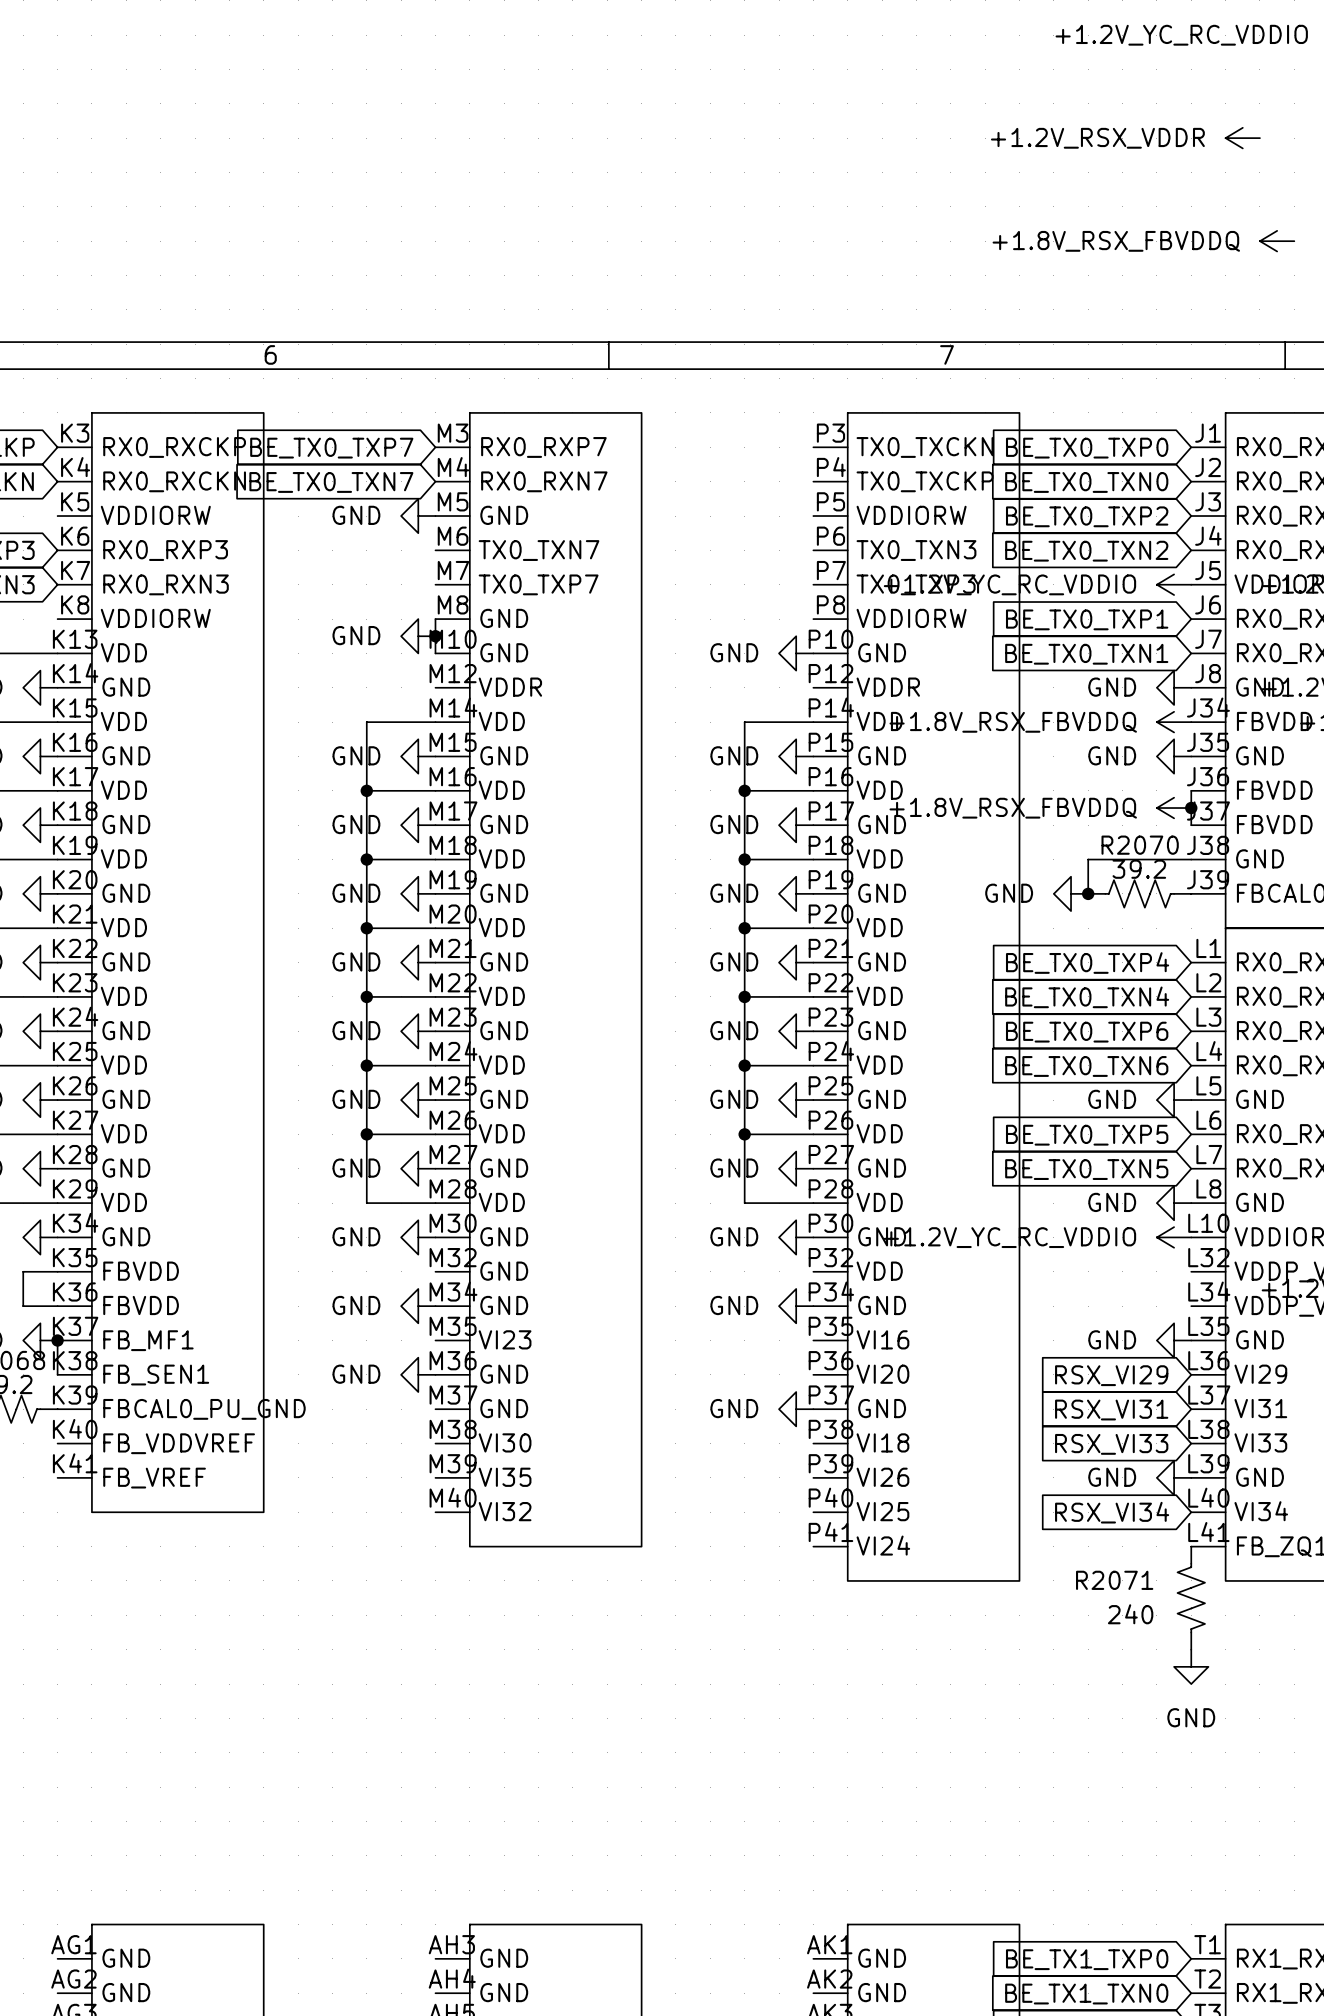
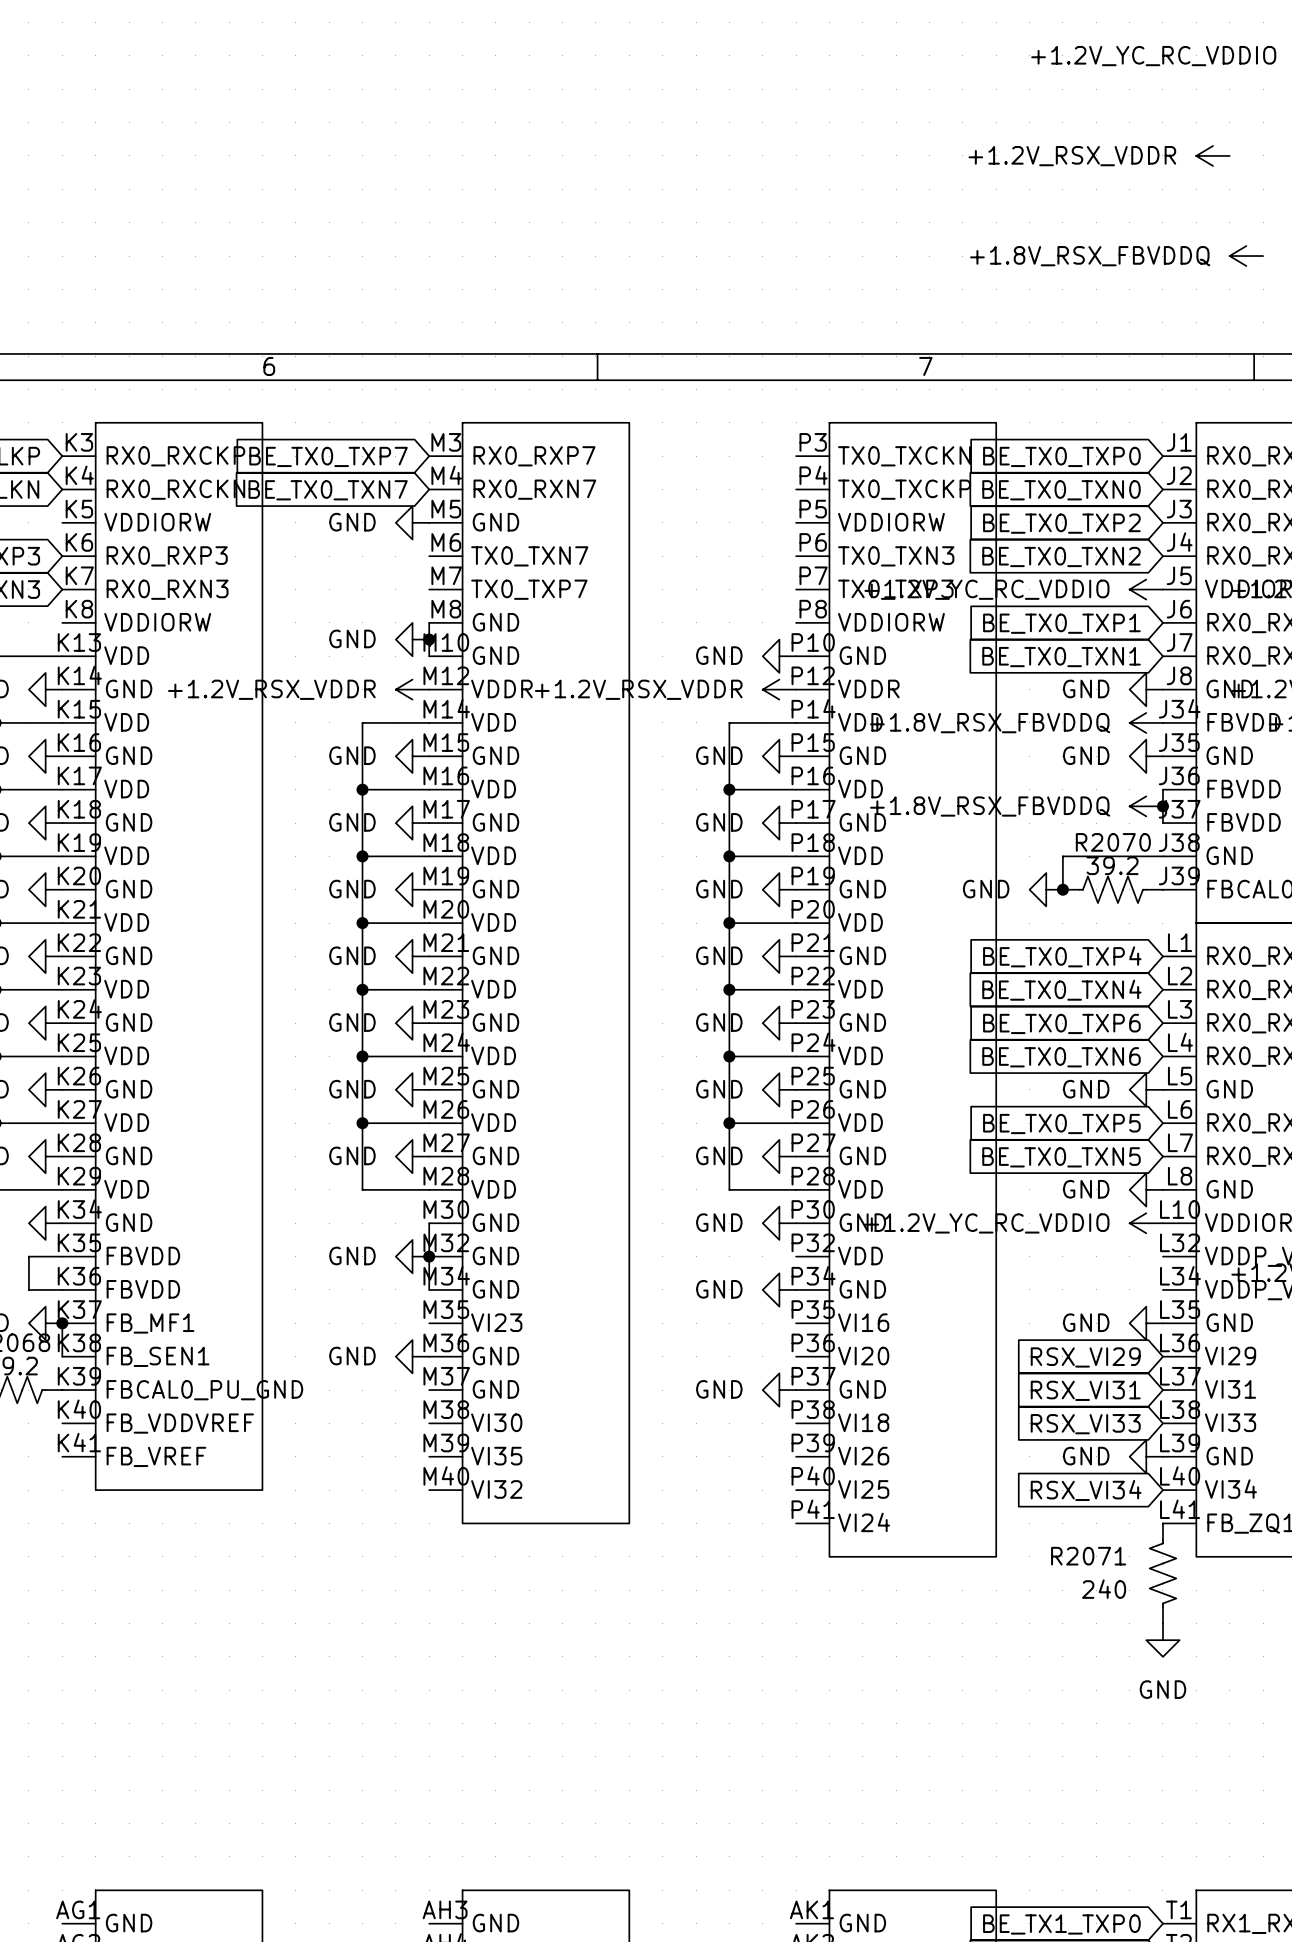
power symbol: none -> +1.2V_RSX_VDDR (412, 689)
power symbol: none -> +1.2V_RSX_VDDR (779, 689)
power symbol: GND (418, 1237) -> none
wire: none -> (429, 1223) (429, 1289)
power symbol: none -> GND (412, 1256)
junction: none -> (429, 1256)
power symbol: GND (418, 1306) -> none

